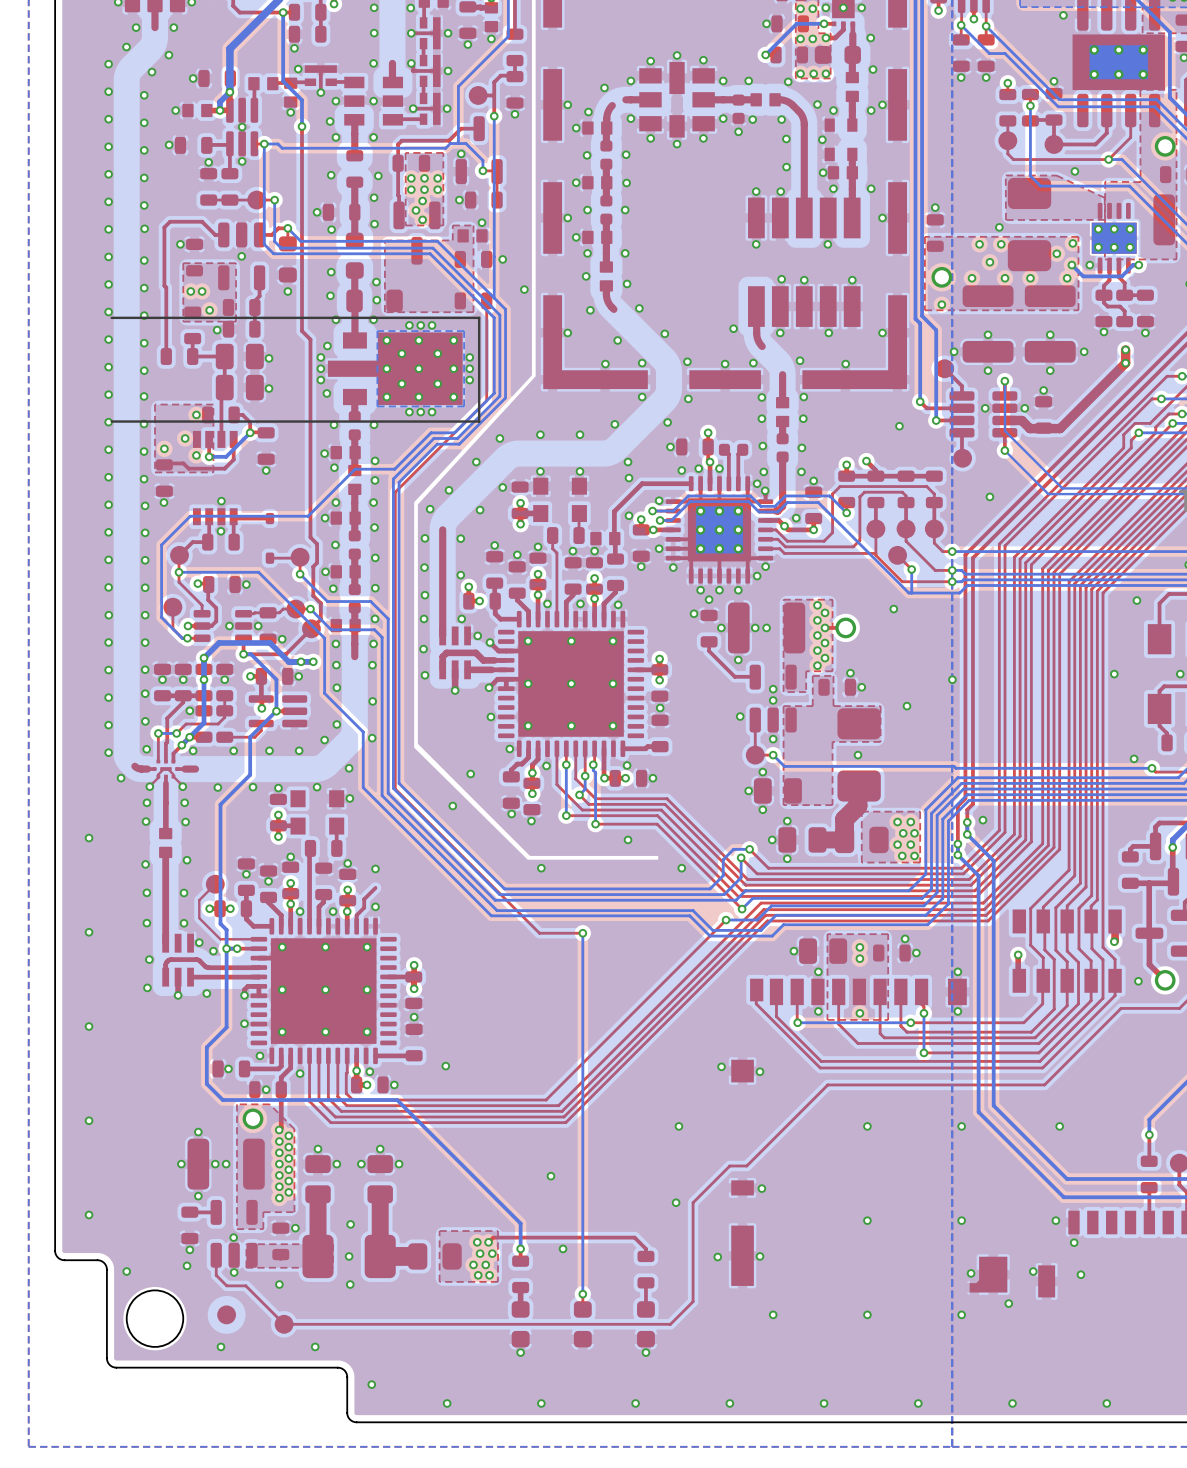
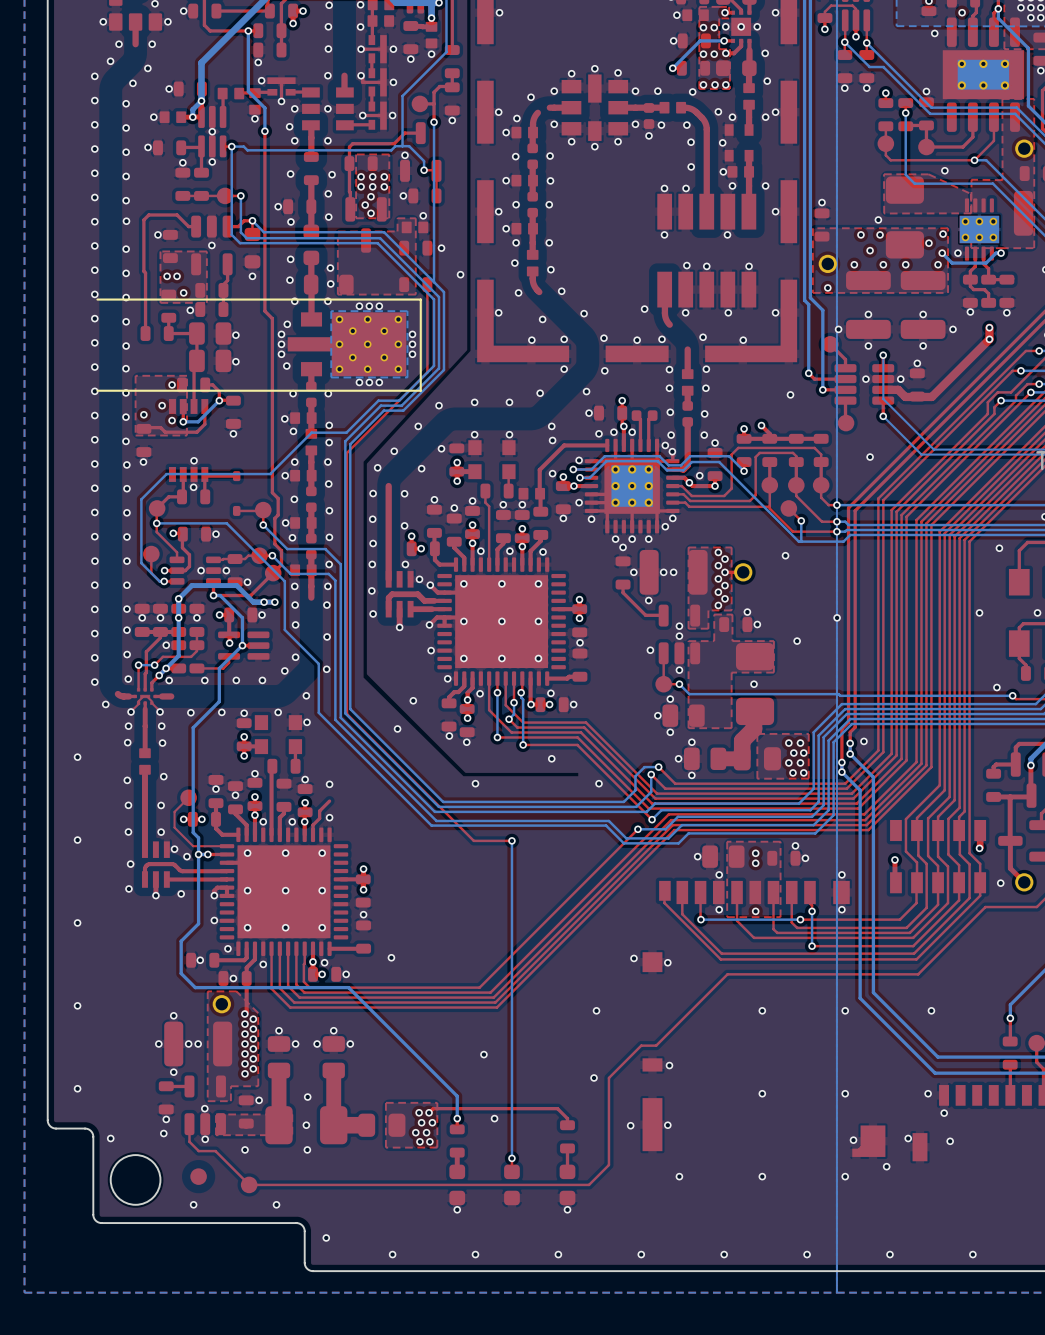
via: (694, 613) -> none

